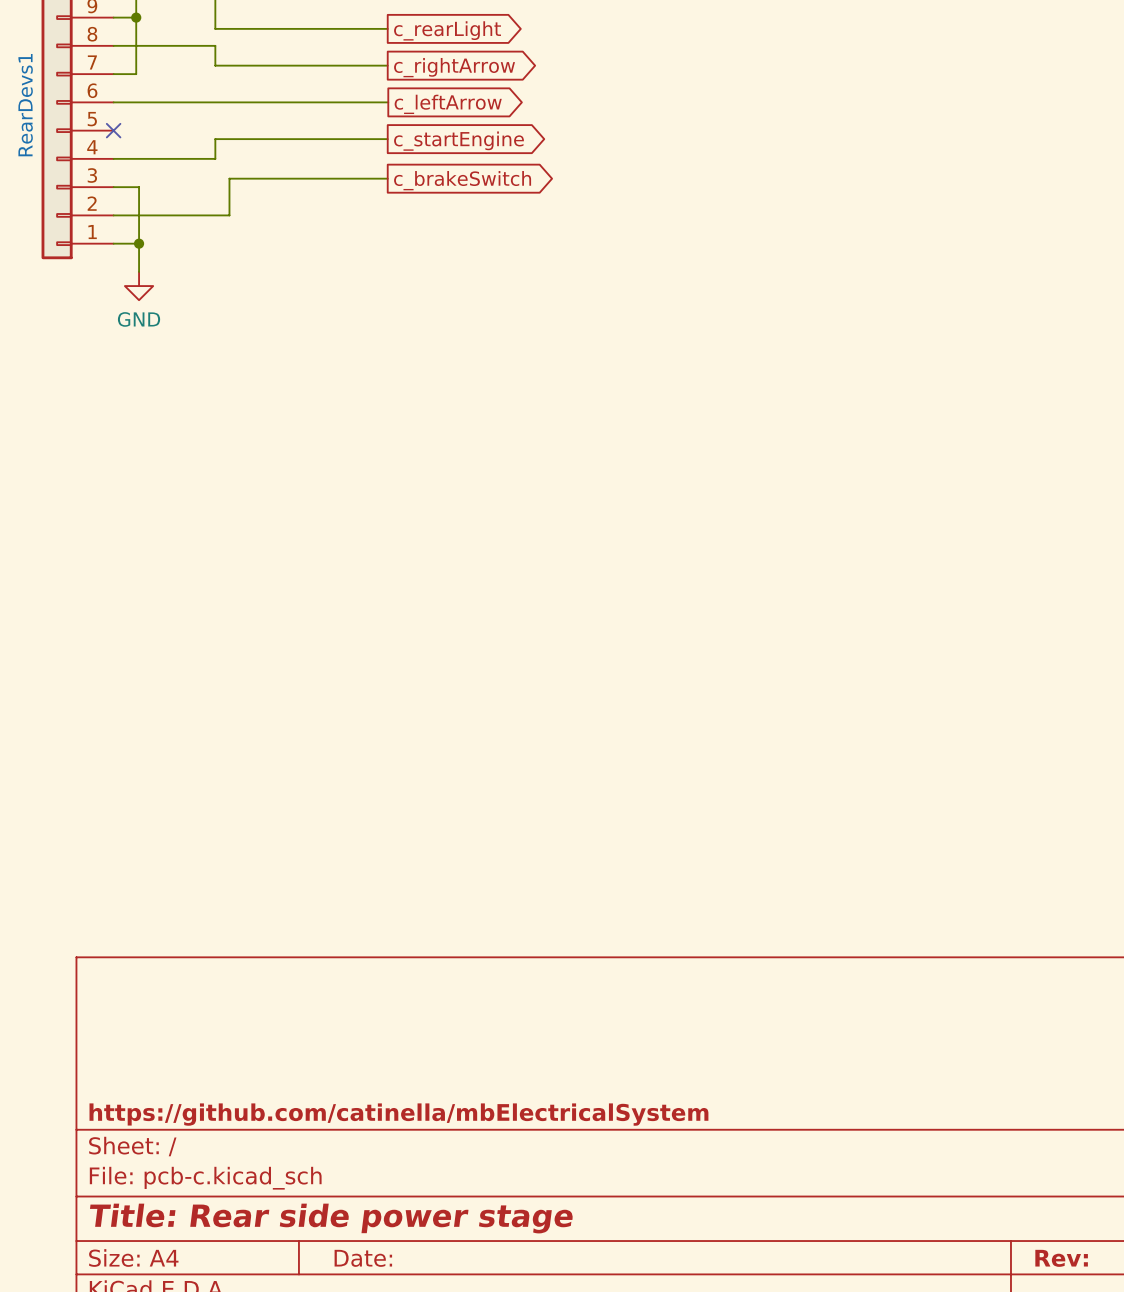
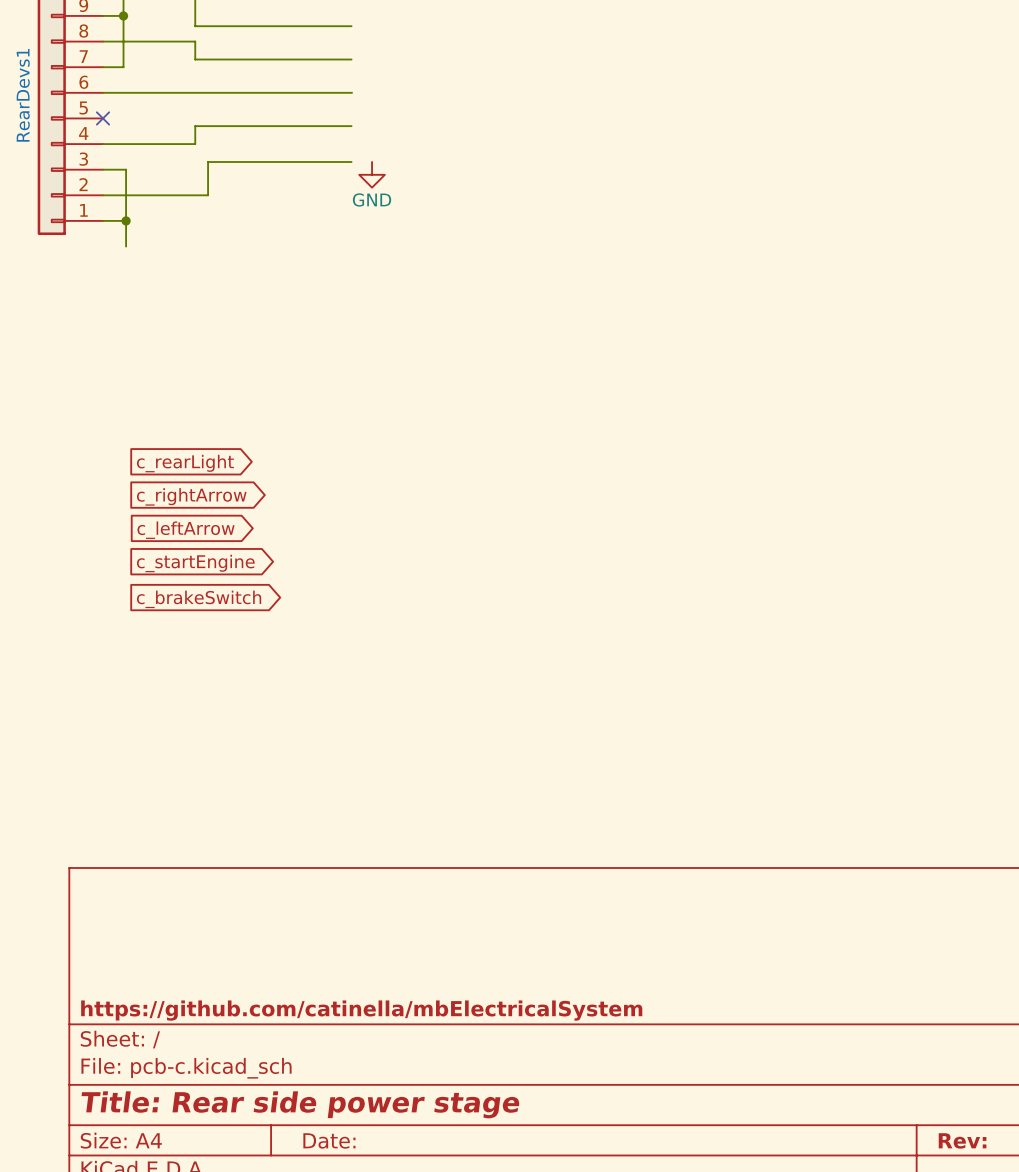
global label: c_rearLight (447, 30) -> none
global label: c_rightArrow (454, 67) -> none
global label: c_leftArrow (448, 104) -> none
global label: c_startEngine (458, 141) -> none
global label: c_brakeSwitch (462, 180) -> none
power symbol: none -> GND (372, 174)
power symbol: GND (139, 286) -> none
global label: none -> c_rearLight (185, 463)
global label: none -> c_rightArrow (191, 496)
global label: none -> c_leftArrow (186, 530)
global label: none -> c_startEngine (195, 563)
global label: none -> c_brakeSwitch (199, 599)

